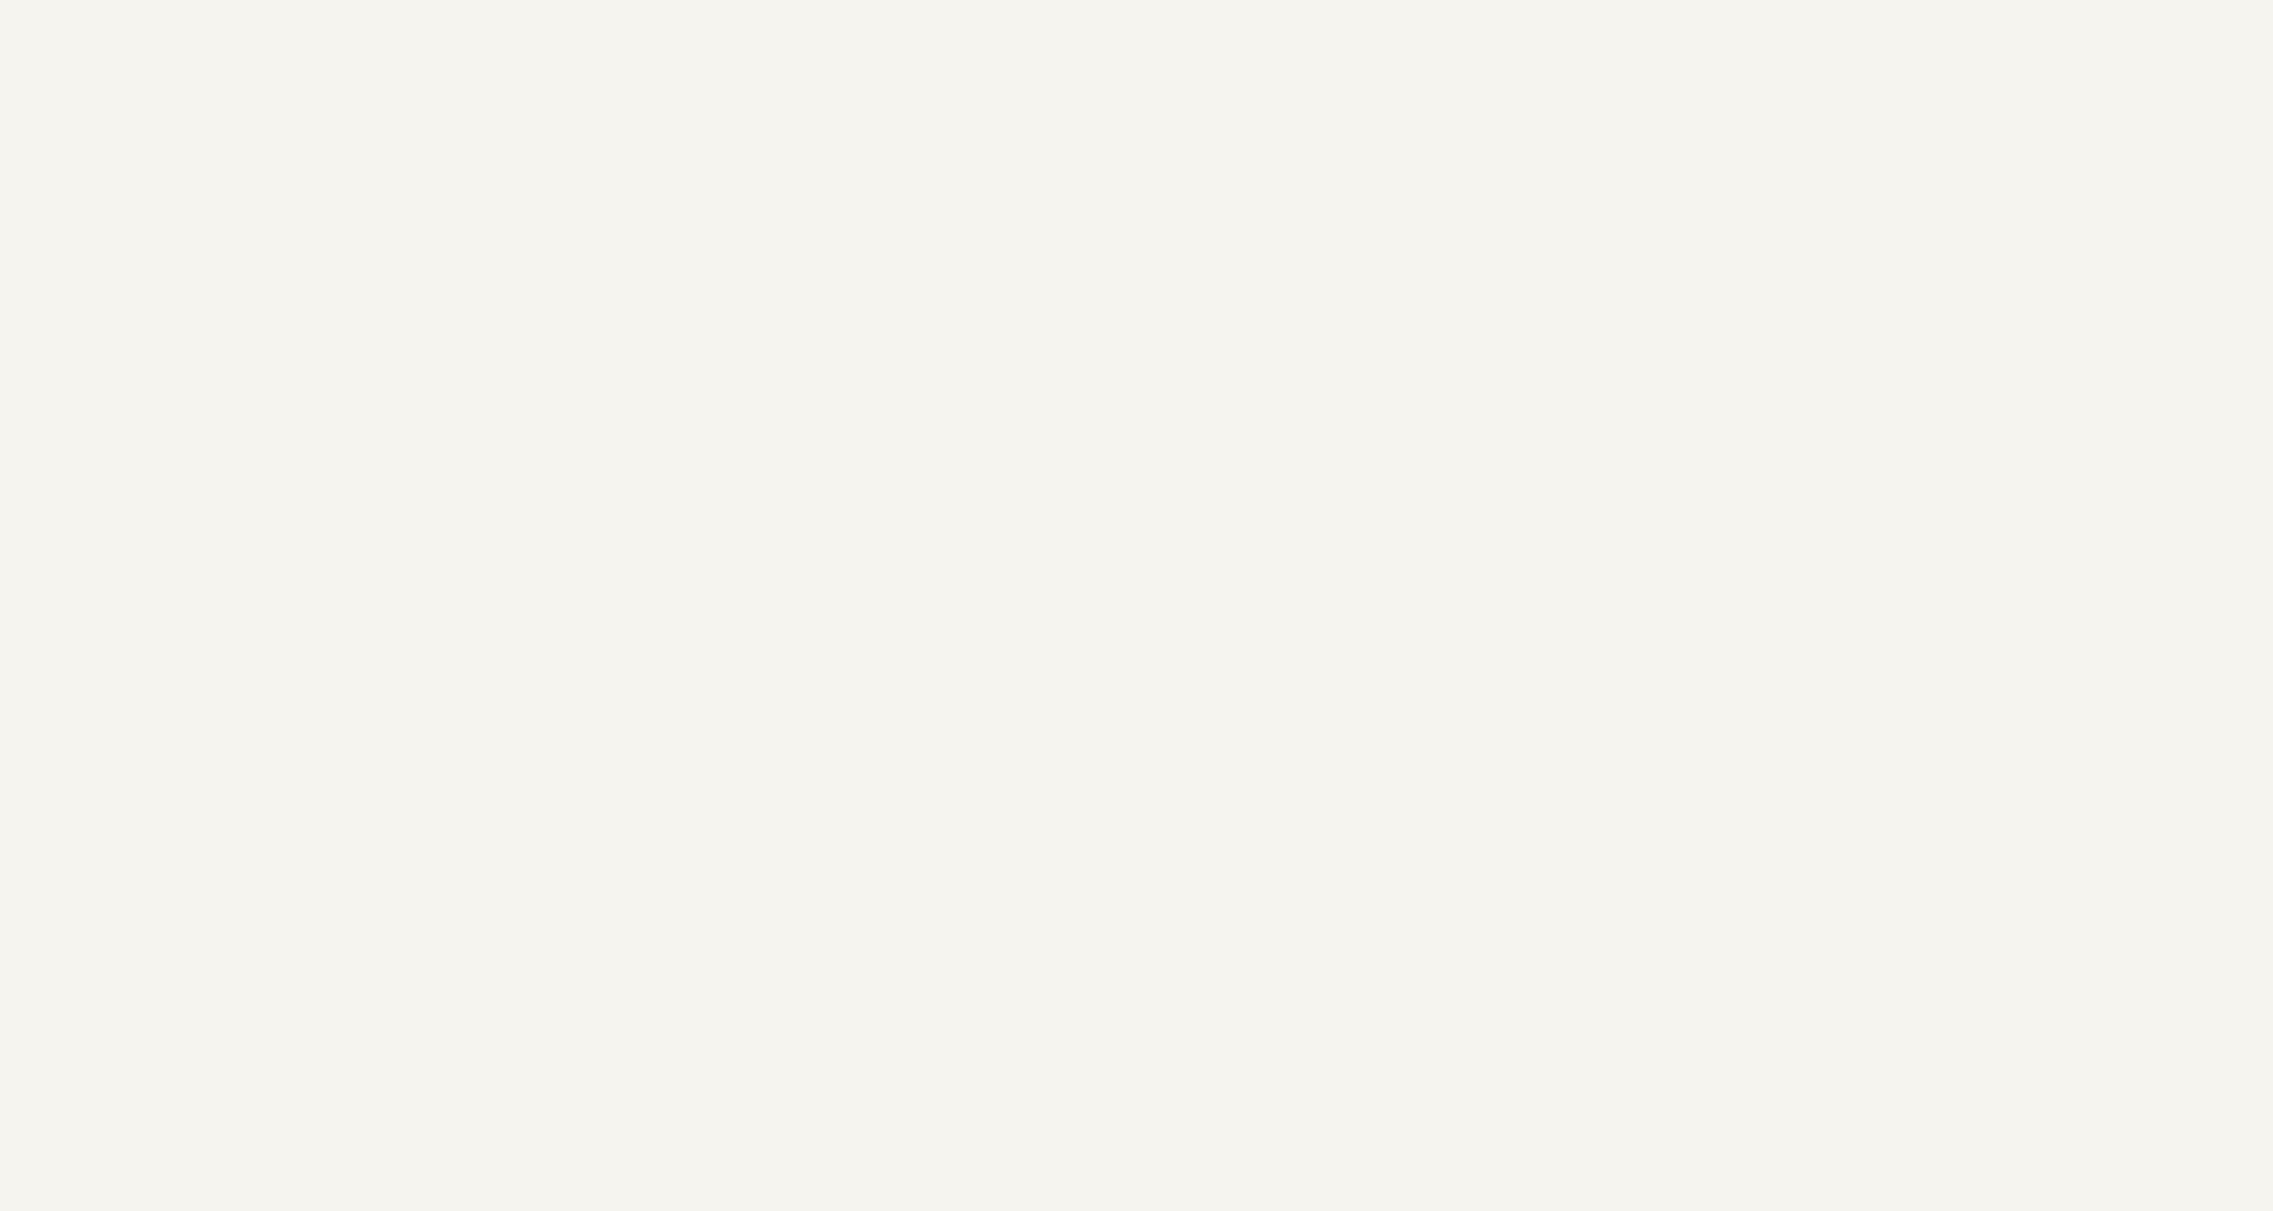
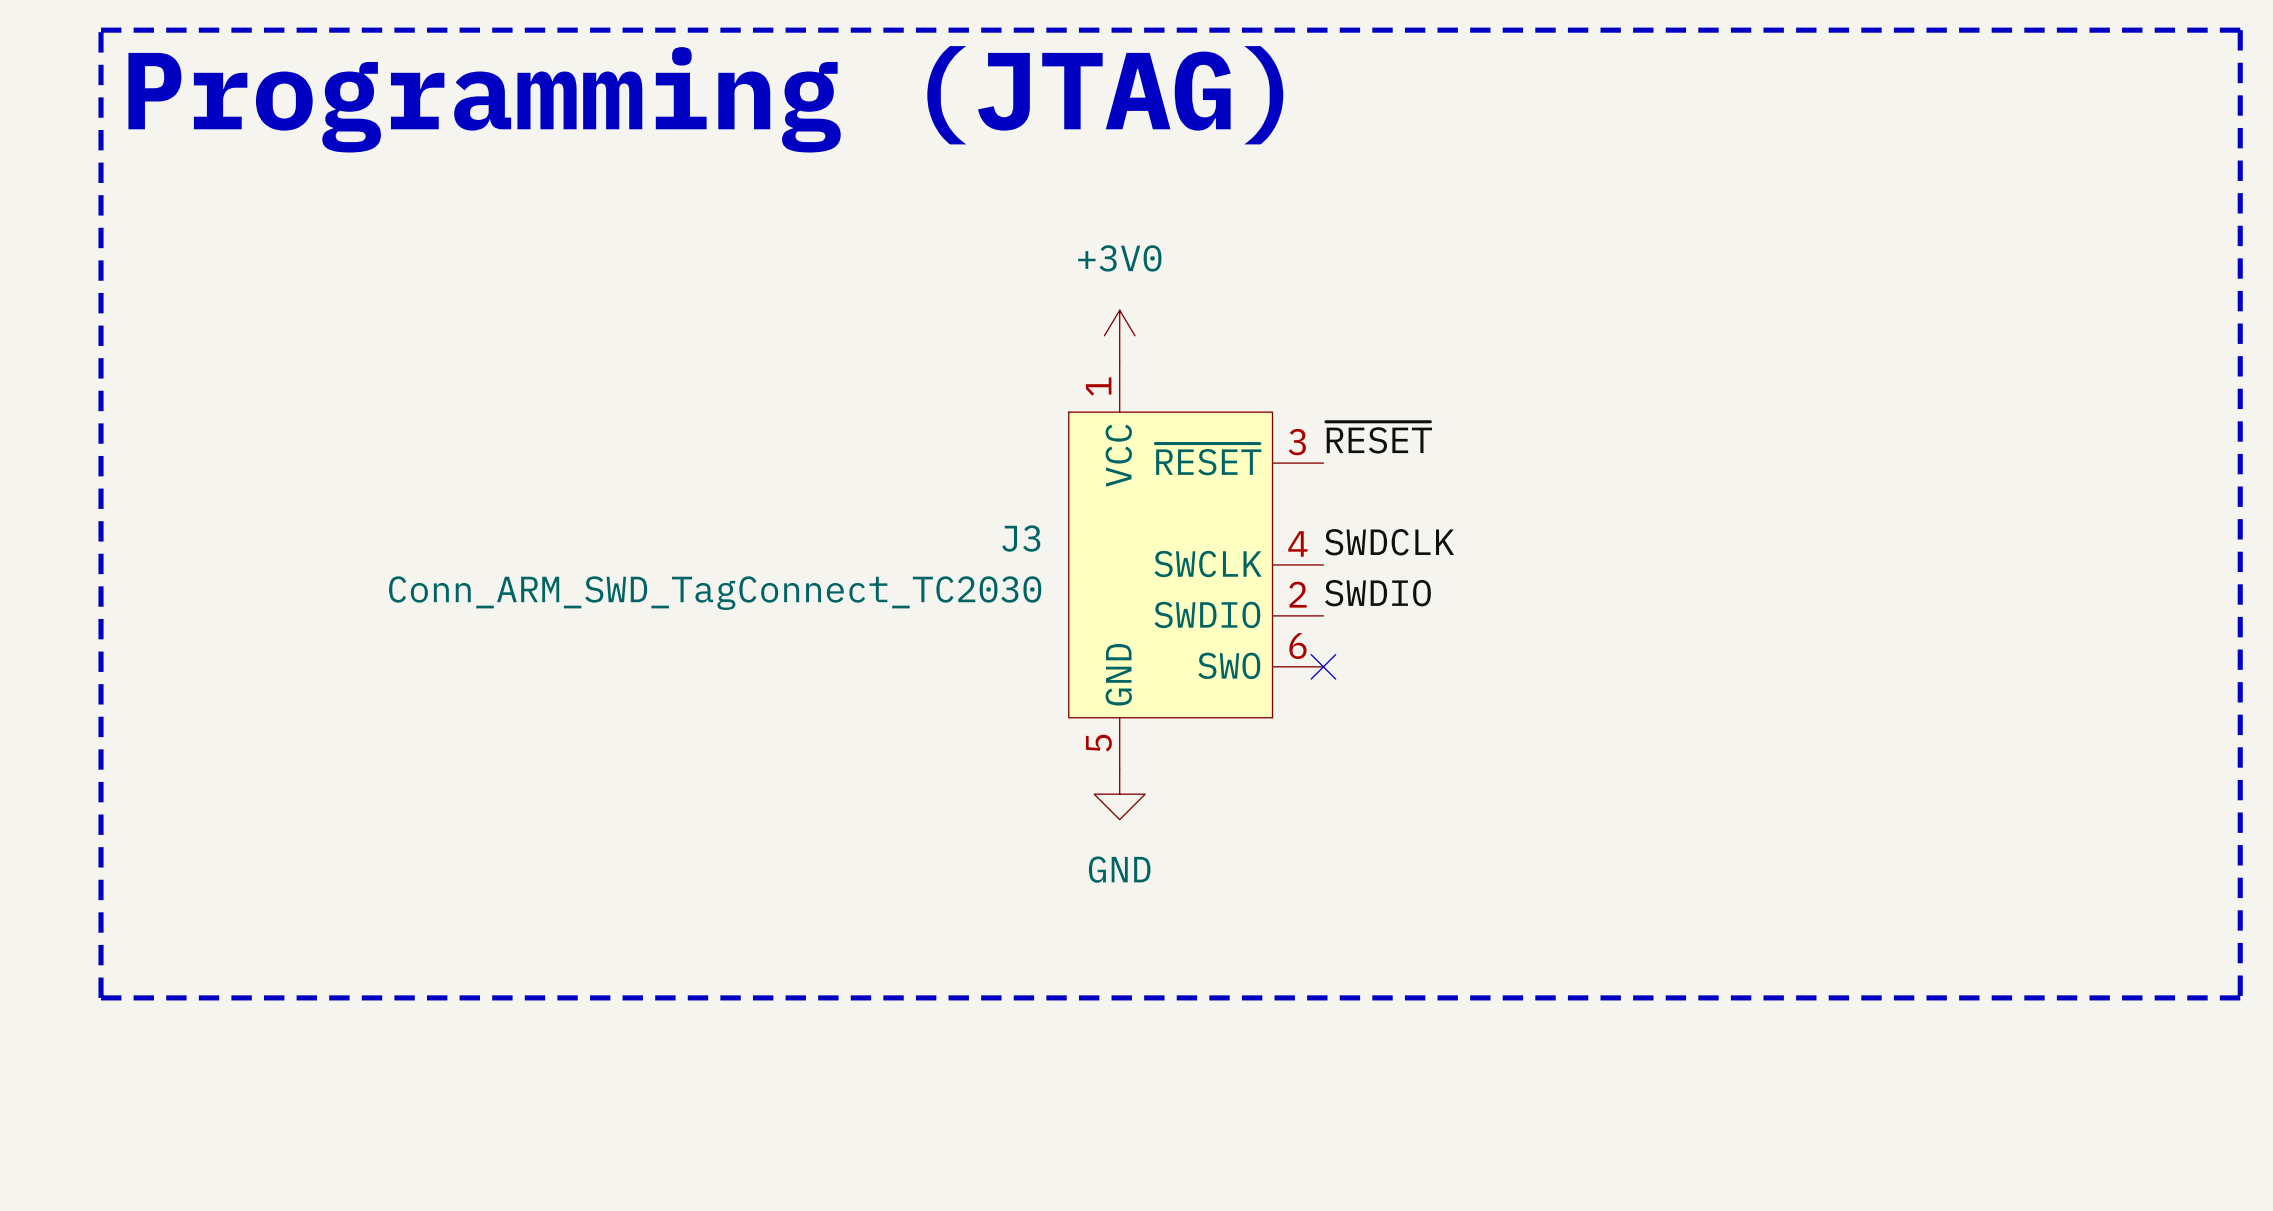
line: none -> (101, 30) (101, 997) (2240, 997) (2240, 30) (101, 30)
text: none -> Programming (JTAG) (705, 99)
power symbol: none -> +3V0 (1119, 335)
label: none -> ~{RESET} (1378, 437)
label: none -> SWDCLK (1389, 542)
J3: none -> Conn_ARM_SWD_TagConnect_TC2030 (1196, 564)
label: none -> SWDIO (1377, 593)
no-connect mark: none -> (1323, 666)
power symbol: none -> GND (1119, 794)

